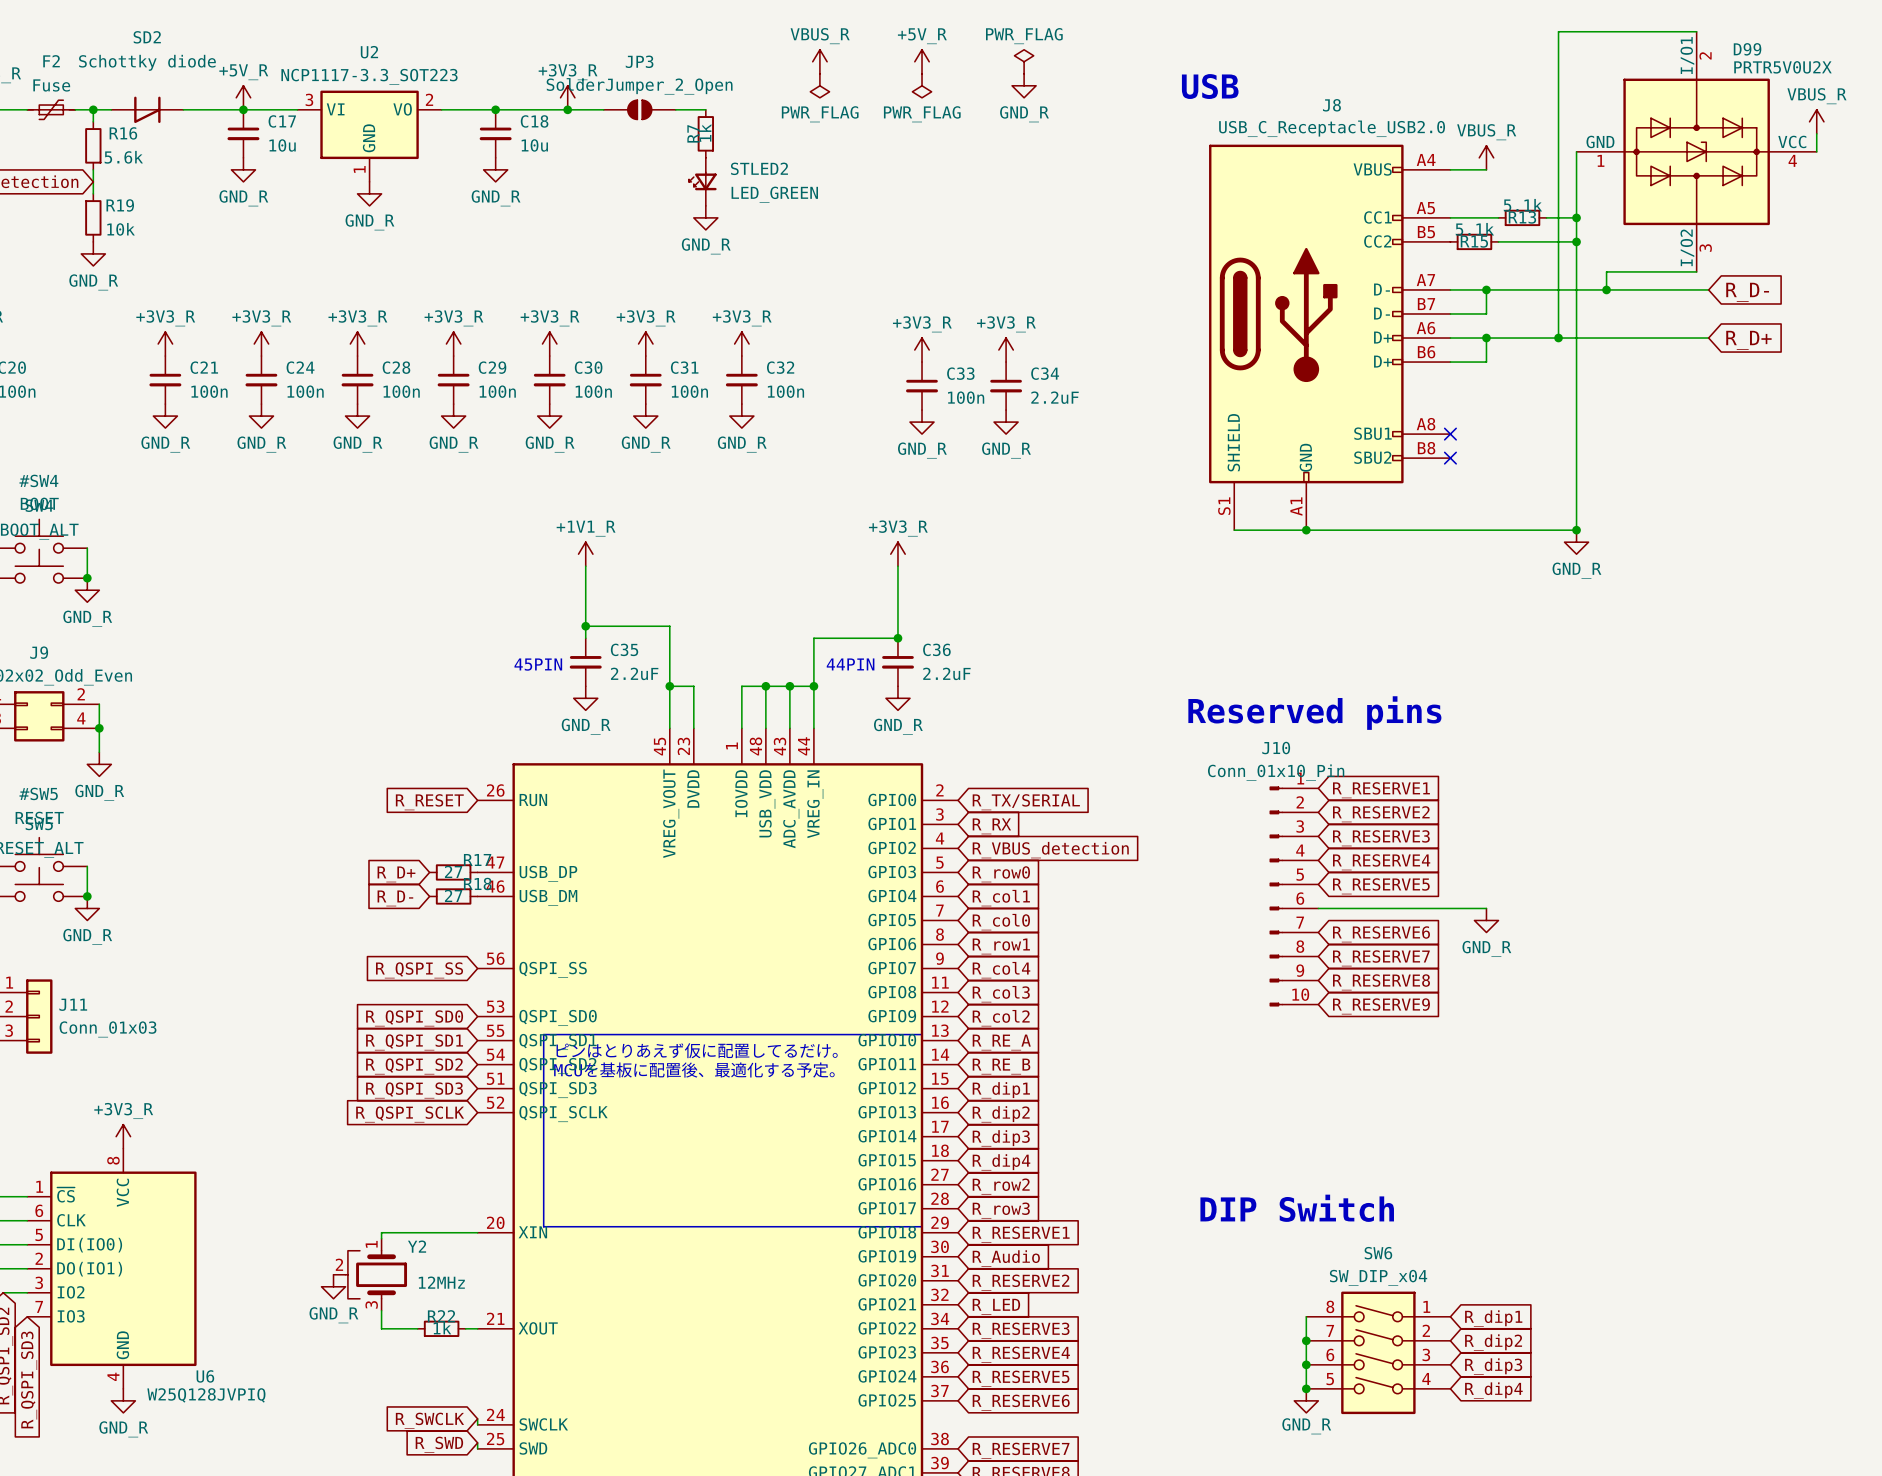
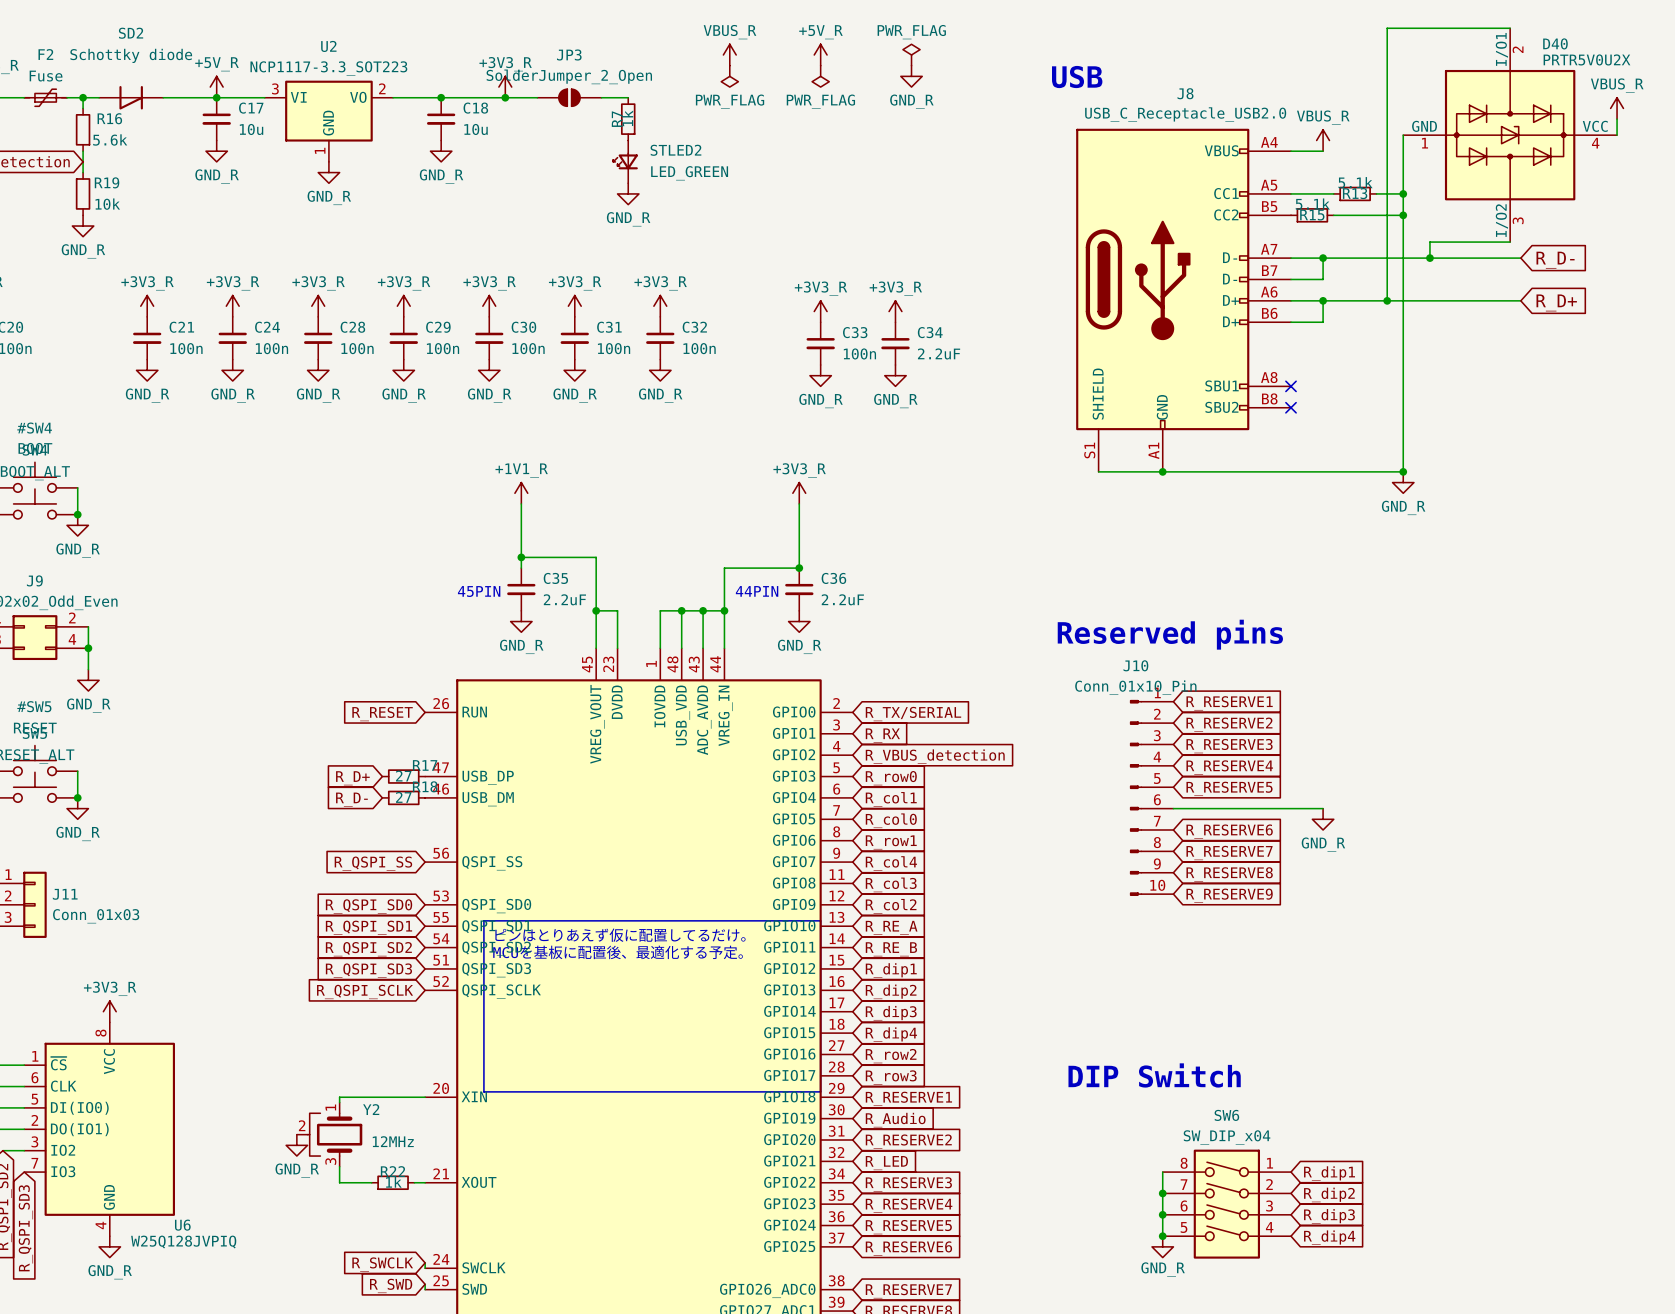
D99 name: D99 (1747, 49) -> D40 (1555, 43)

